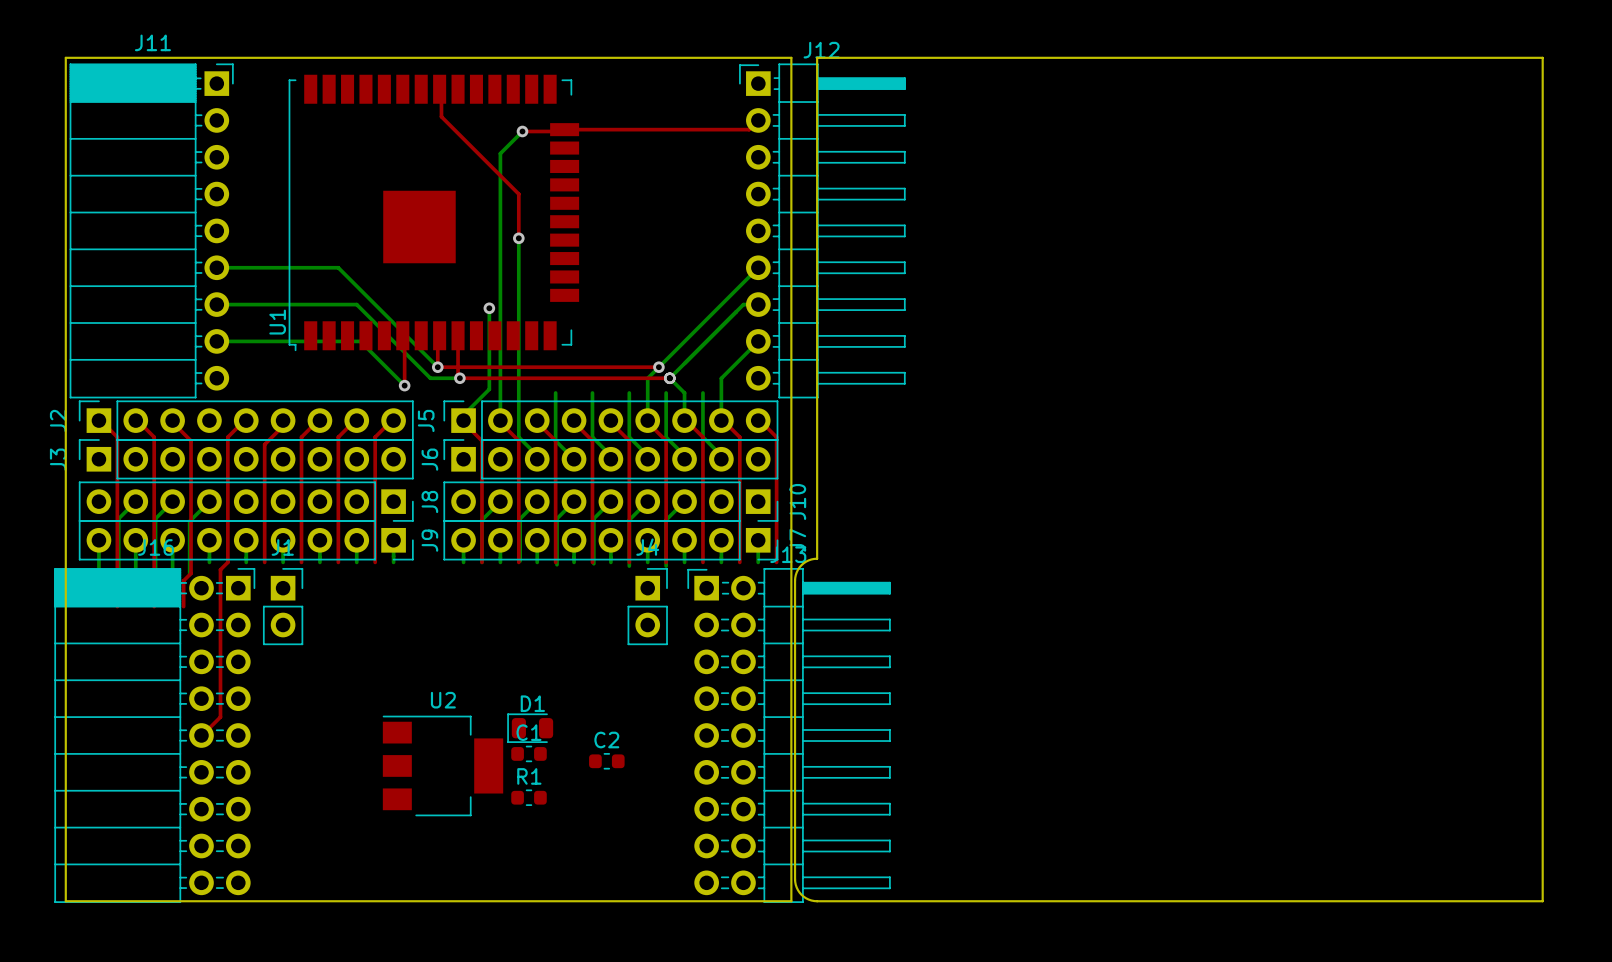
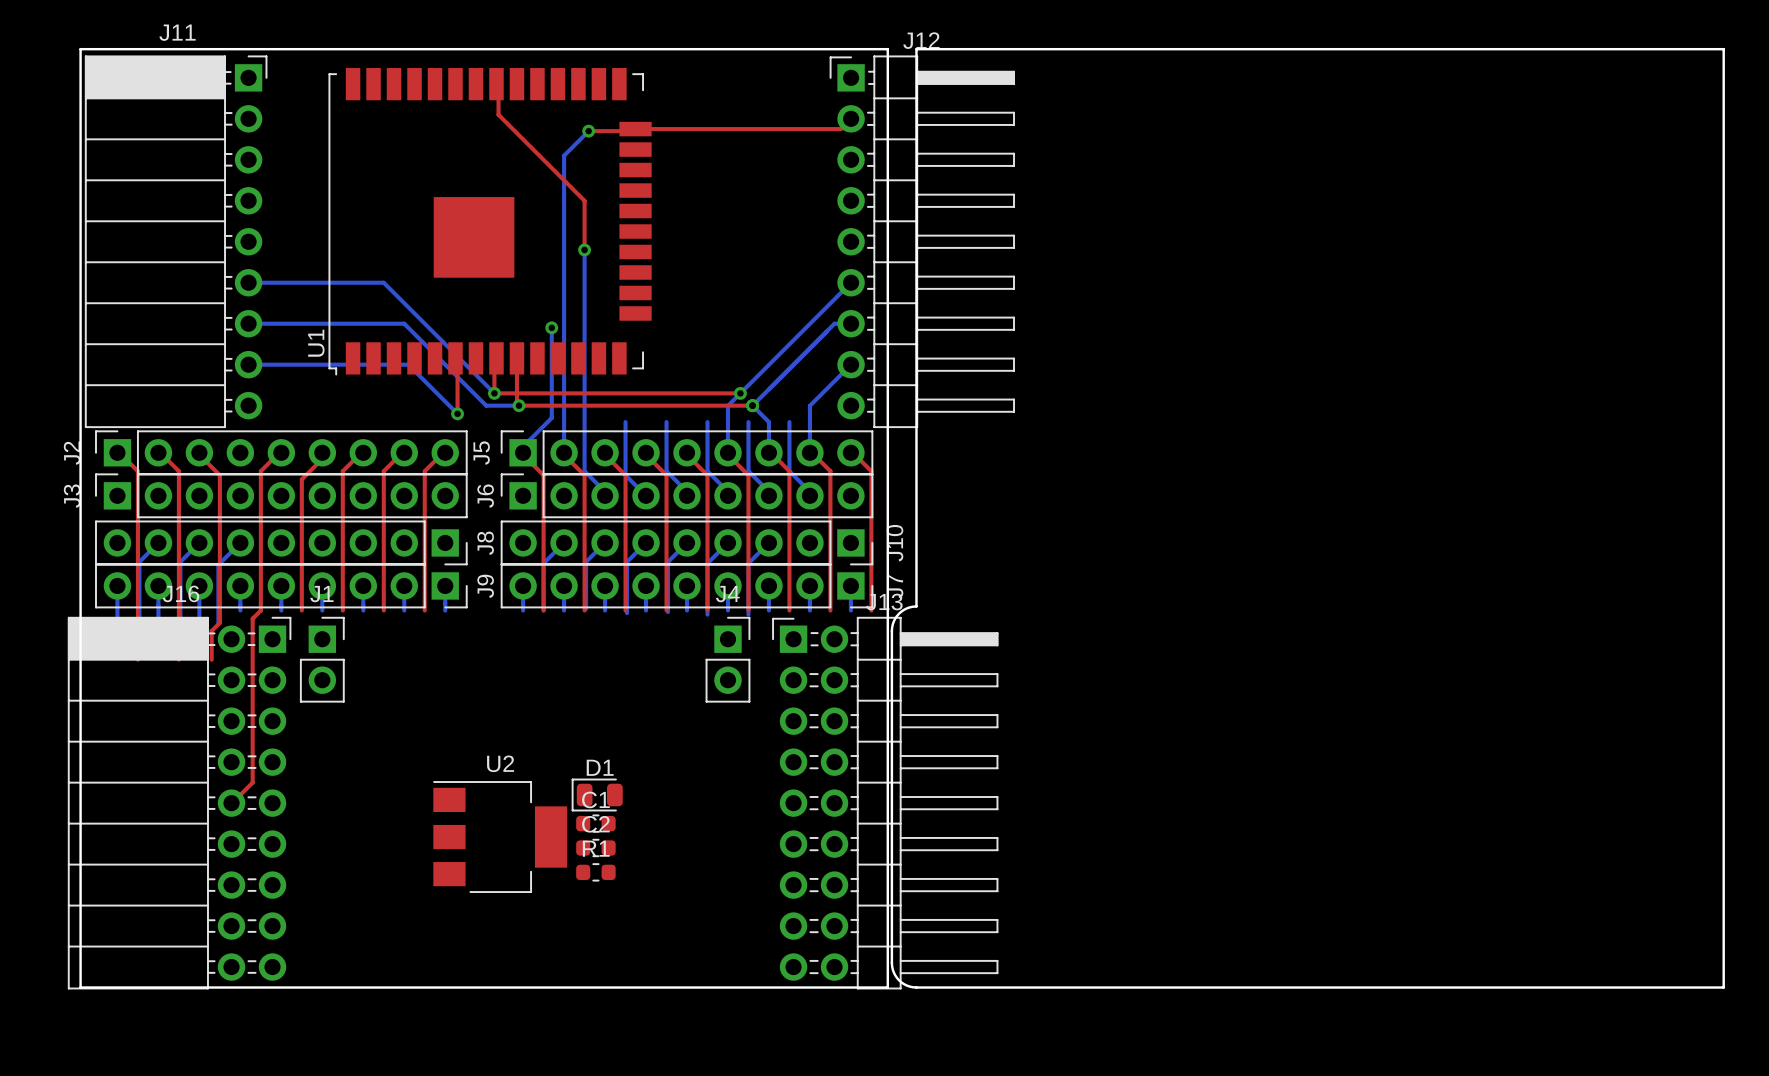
C2 position: (606, 761) -> (595, 847)

